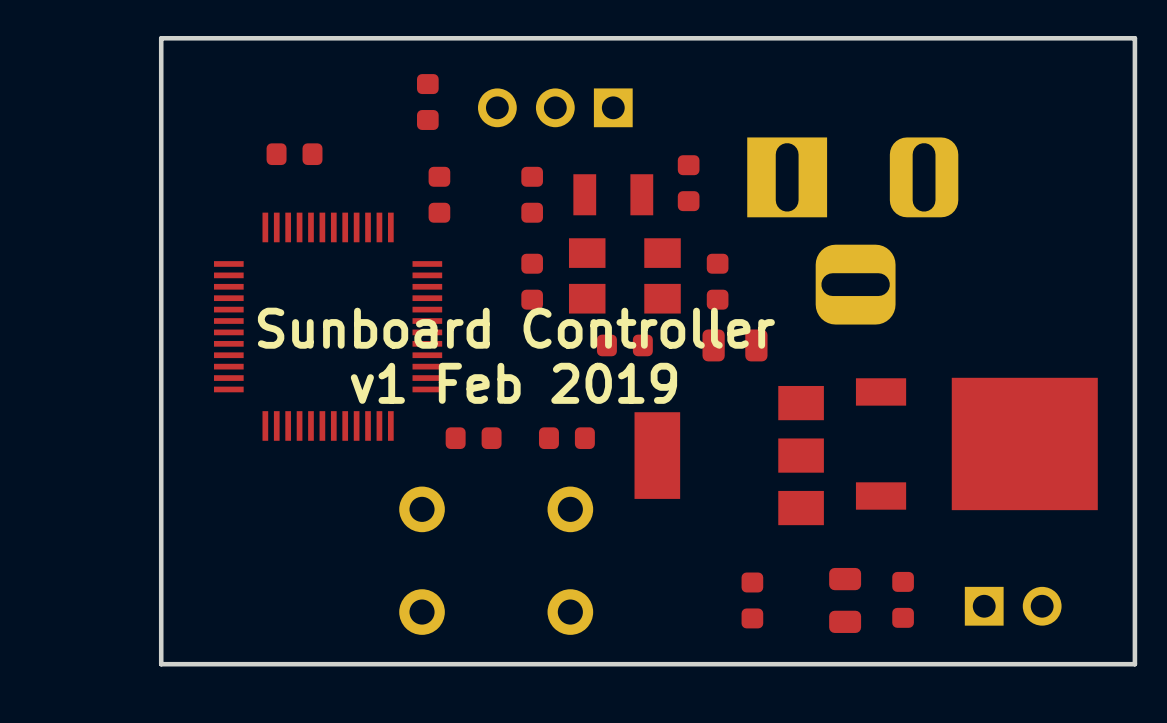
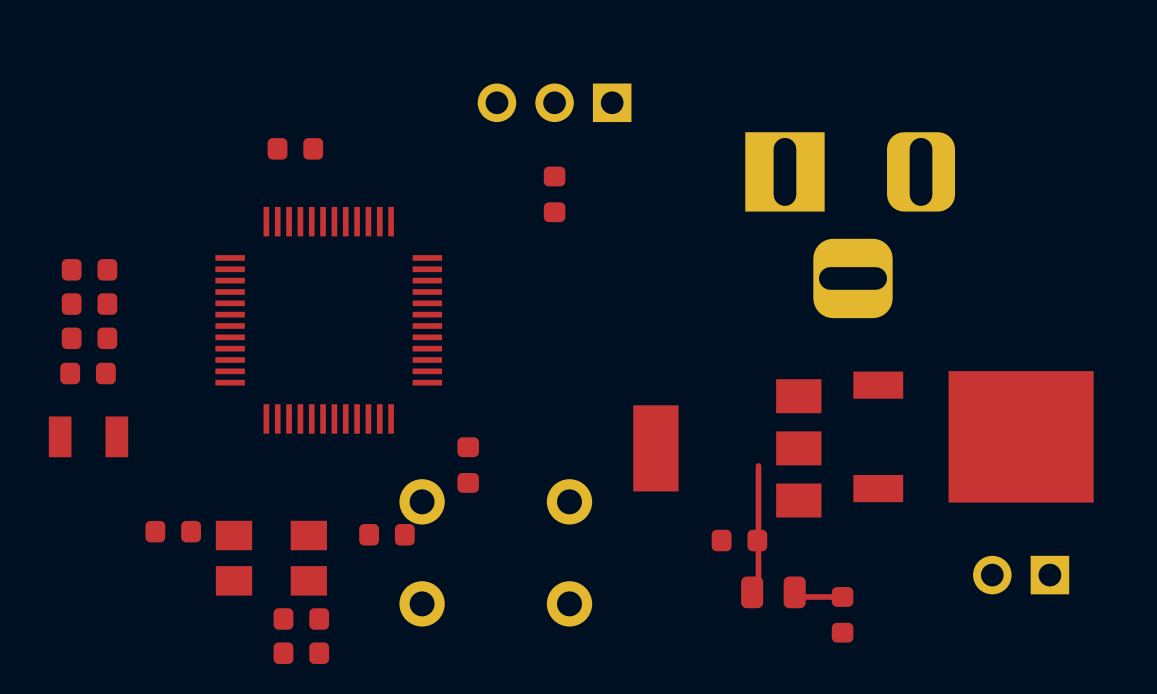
board edge: (1134, 38) (1134, 664) (161, 664) (161, 38) (1134, 38) -> none
part: (427, 102) -> none
part: (688, 183) -> none
part: (439, 194) -> none
part position: (532, 194) -> (554, 194)
part: (613, 194) -> none
part: none -> (89, 269)
part position: (624, 275) -> (271, 558)
part: (532, 281) -> none
part: (717, 281) -> none
part: none -> (89, 304)
text: Sunboard Controller (516, 328) -> none
part: none -> (89, 338)
part: (624, 345) -> none
part position: (735, 345) -> (773, 592)
part: none -> (88, 373)
text: v1 Feb 2019 (513, 383) -> none
part rotation: 0° (473, 438) -> 90° clockwise (468, 465)
part position: (473, 438) -> (468, 465)
part: (566, 438) -> none
part: none -> (88, 436)
top track: none -> (758, 465) (758, 586) (752, 592)
part: none -> (173, 531)
part: none -> (386, 534)
part footprint: [829, 567, 862, 633] -> [831, 587, 854, 643]
part: (903, 599) -> none
part rotation: 0° (752, 600) -> 90° clockwise (739, 540)
part position: (752, 600) -> (739, 540)
top track: none -> (794, 592) (799, 596) (842, 596)
part rotation: 0° (1013, 606) -> 180° (1021, 575)
part: none -> (301, 618)
part: none -> (301, 653)

